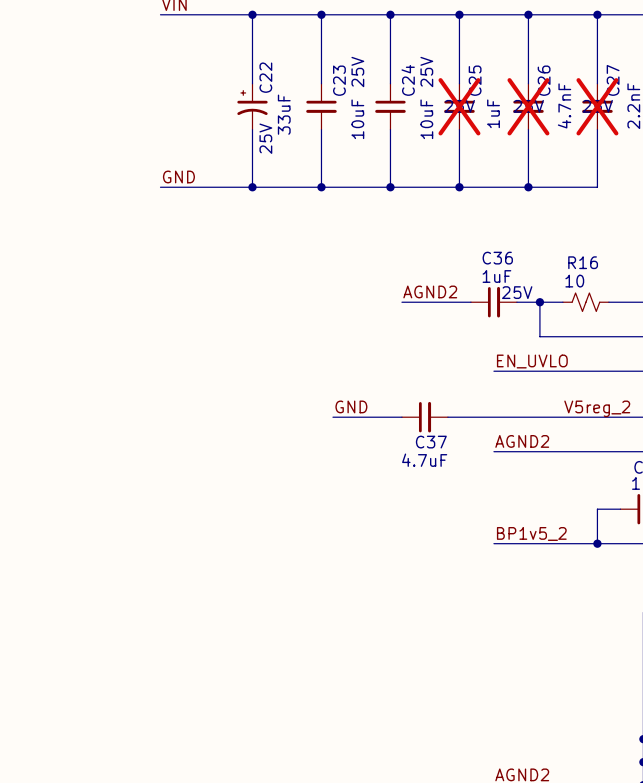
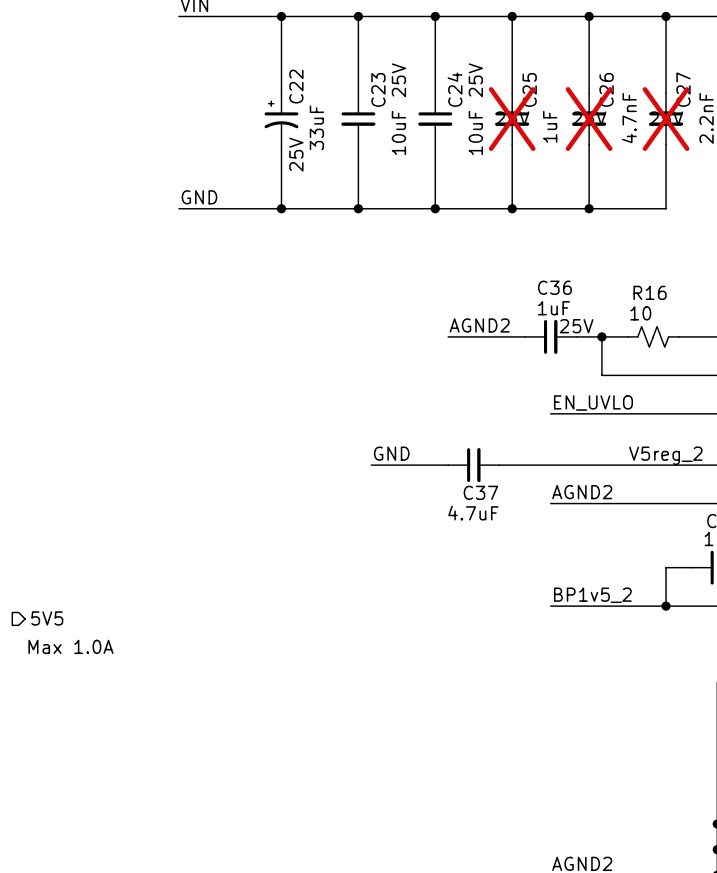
hierarchical label: none -> 5V5 (47, 618)
text: none -> Max 1.0A (70, 646)

